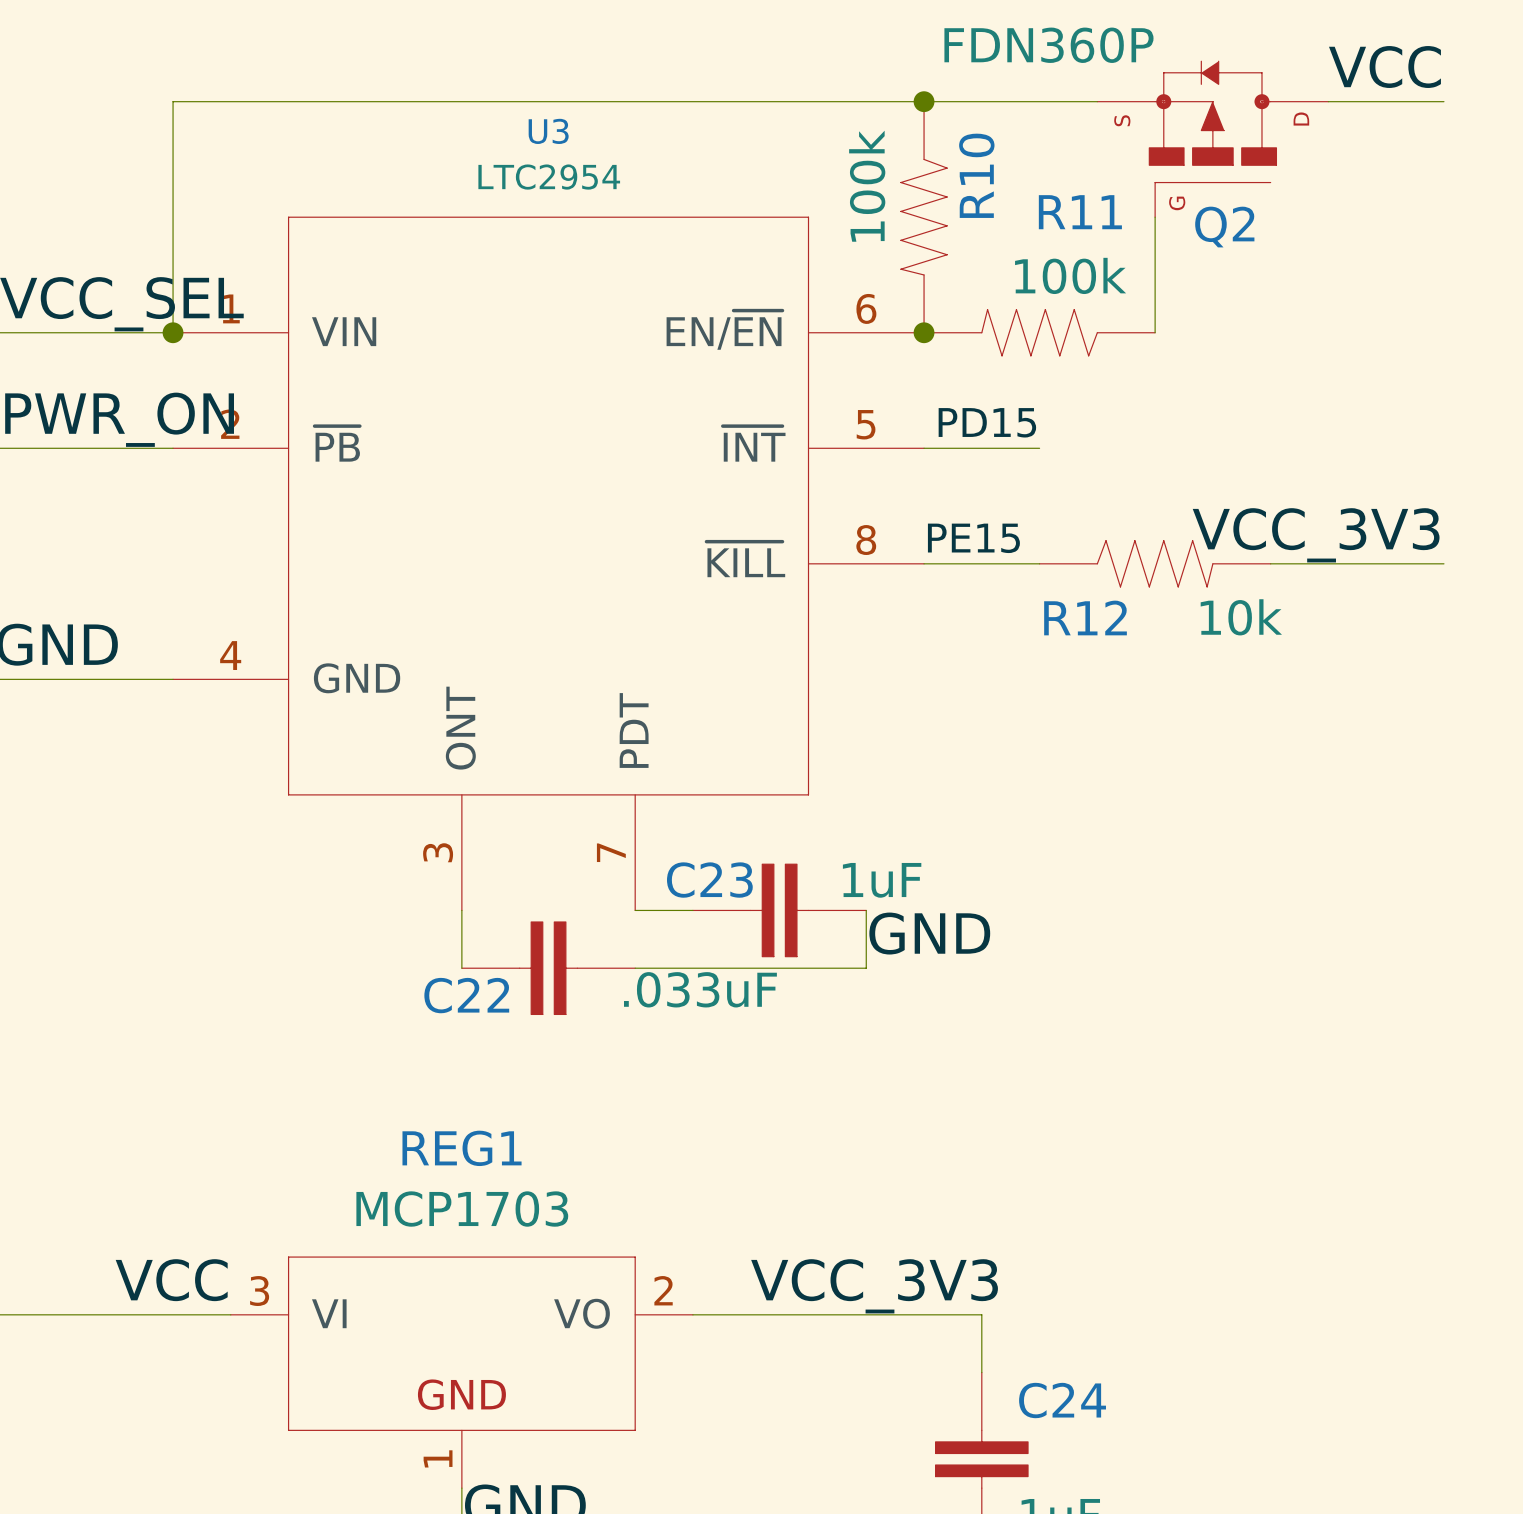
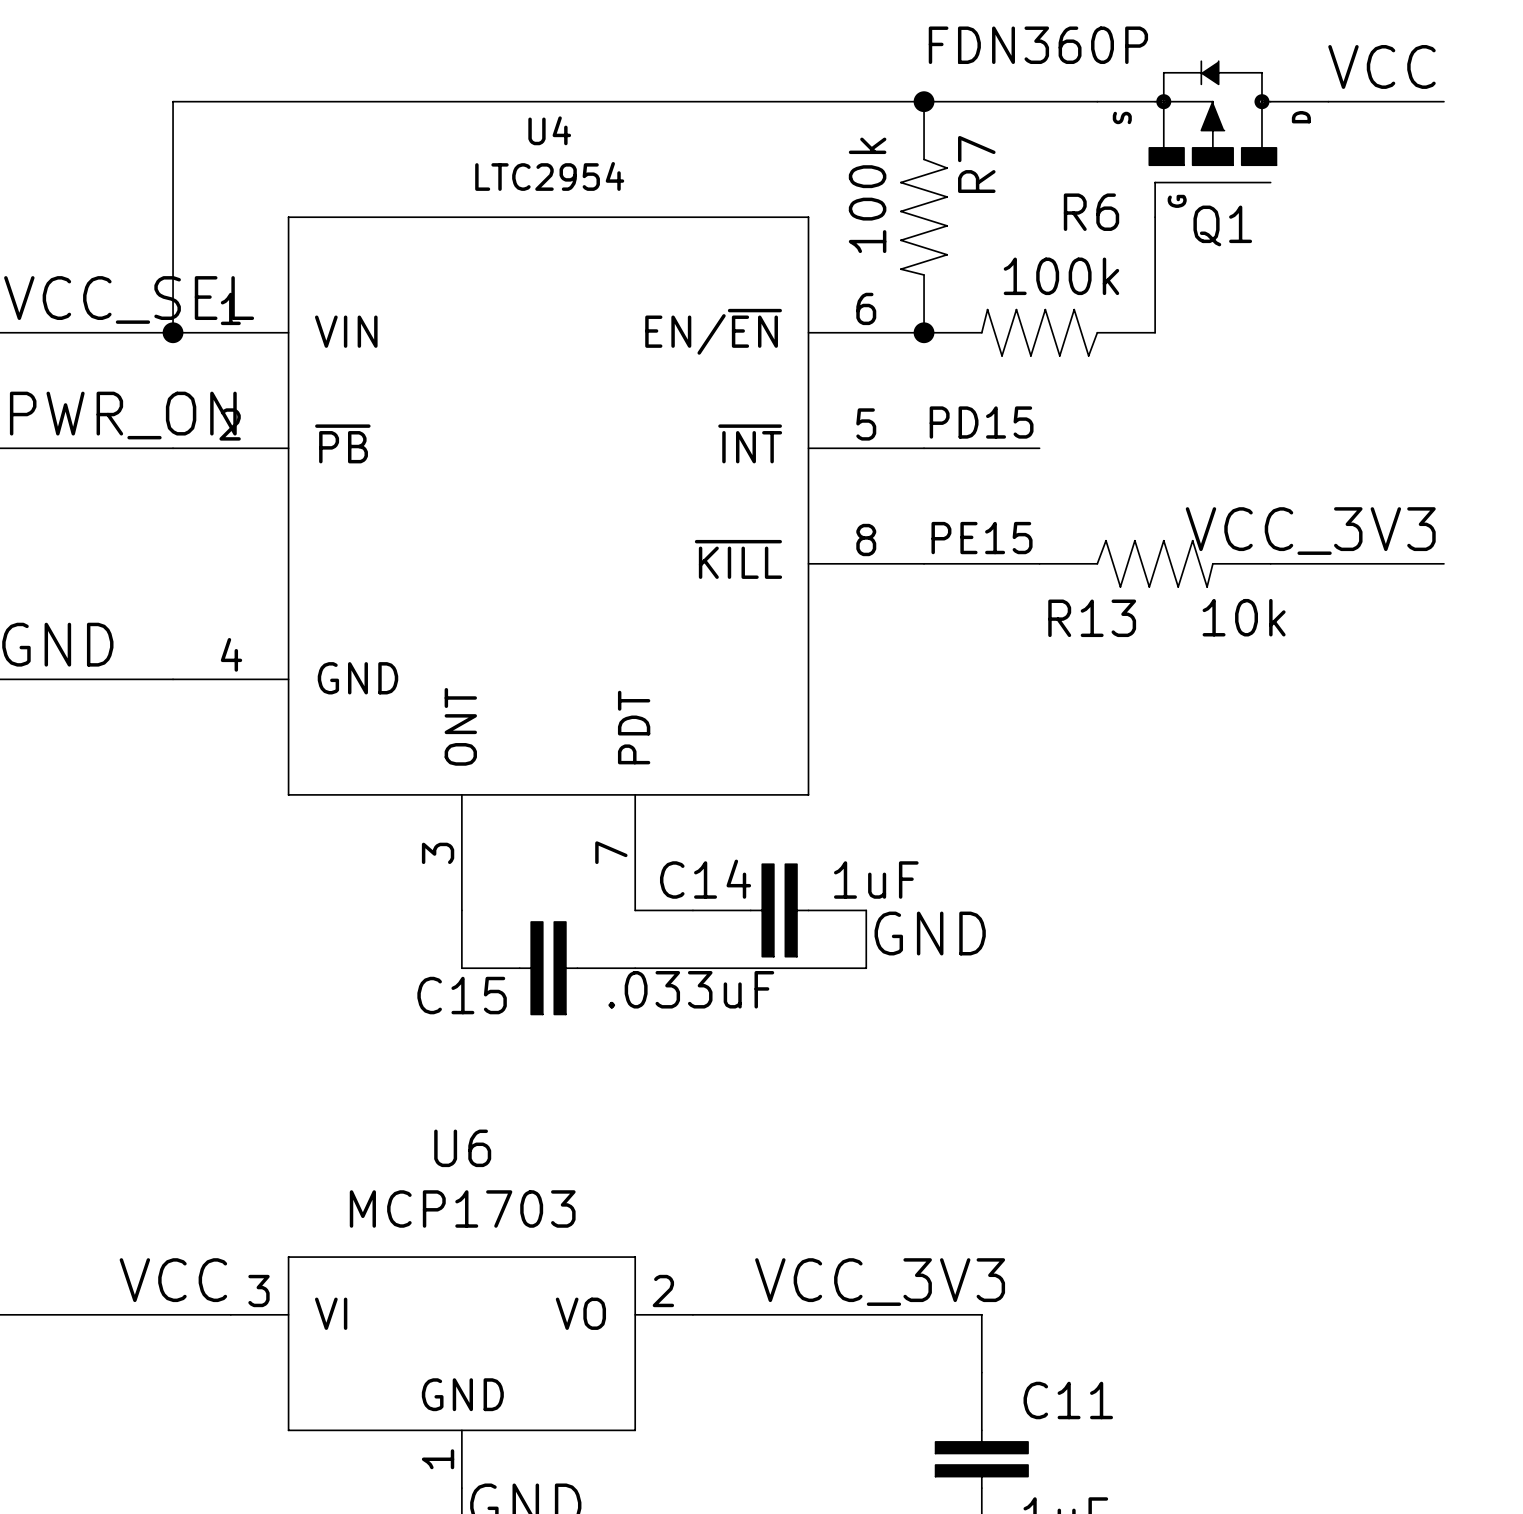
U3 name: U3 (548, 131) -> U4 (549, 130)
R10 name: R10 (976, 175) -> R7 (976, 164)
R11 name: R11 (1080, 212) -> R6 (1091, 212)
Q2 name: Q2 (1224, 227) -> Q1 (1222, 225)
R12 name: R12 (1085, 617) -> R13 (1092, 618)
C23 name: C23 (709, 880) -> C14 (705, 879)
C22 name: C22 (466, 995) -> C15 (462, 995)
REG1 name: REG1 (462, 1148) -> U6 (462, 1148)
C24 name: C24 (1062, 1400) -> C11 (1068, 1400)

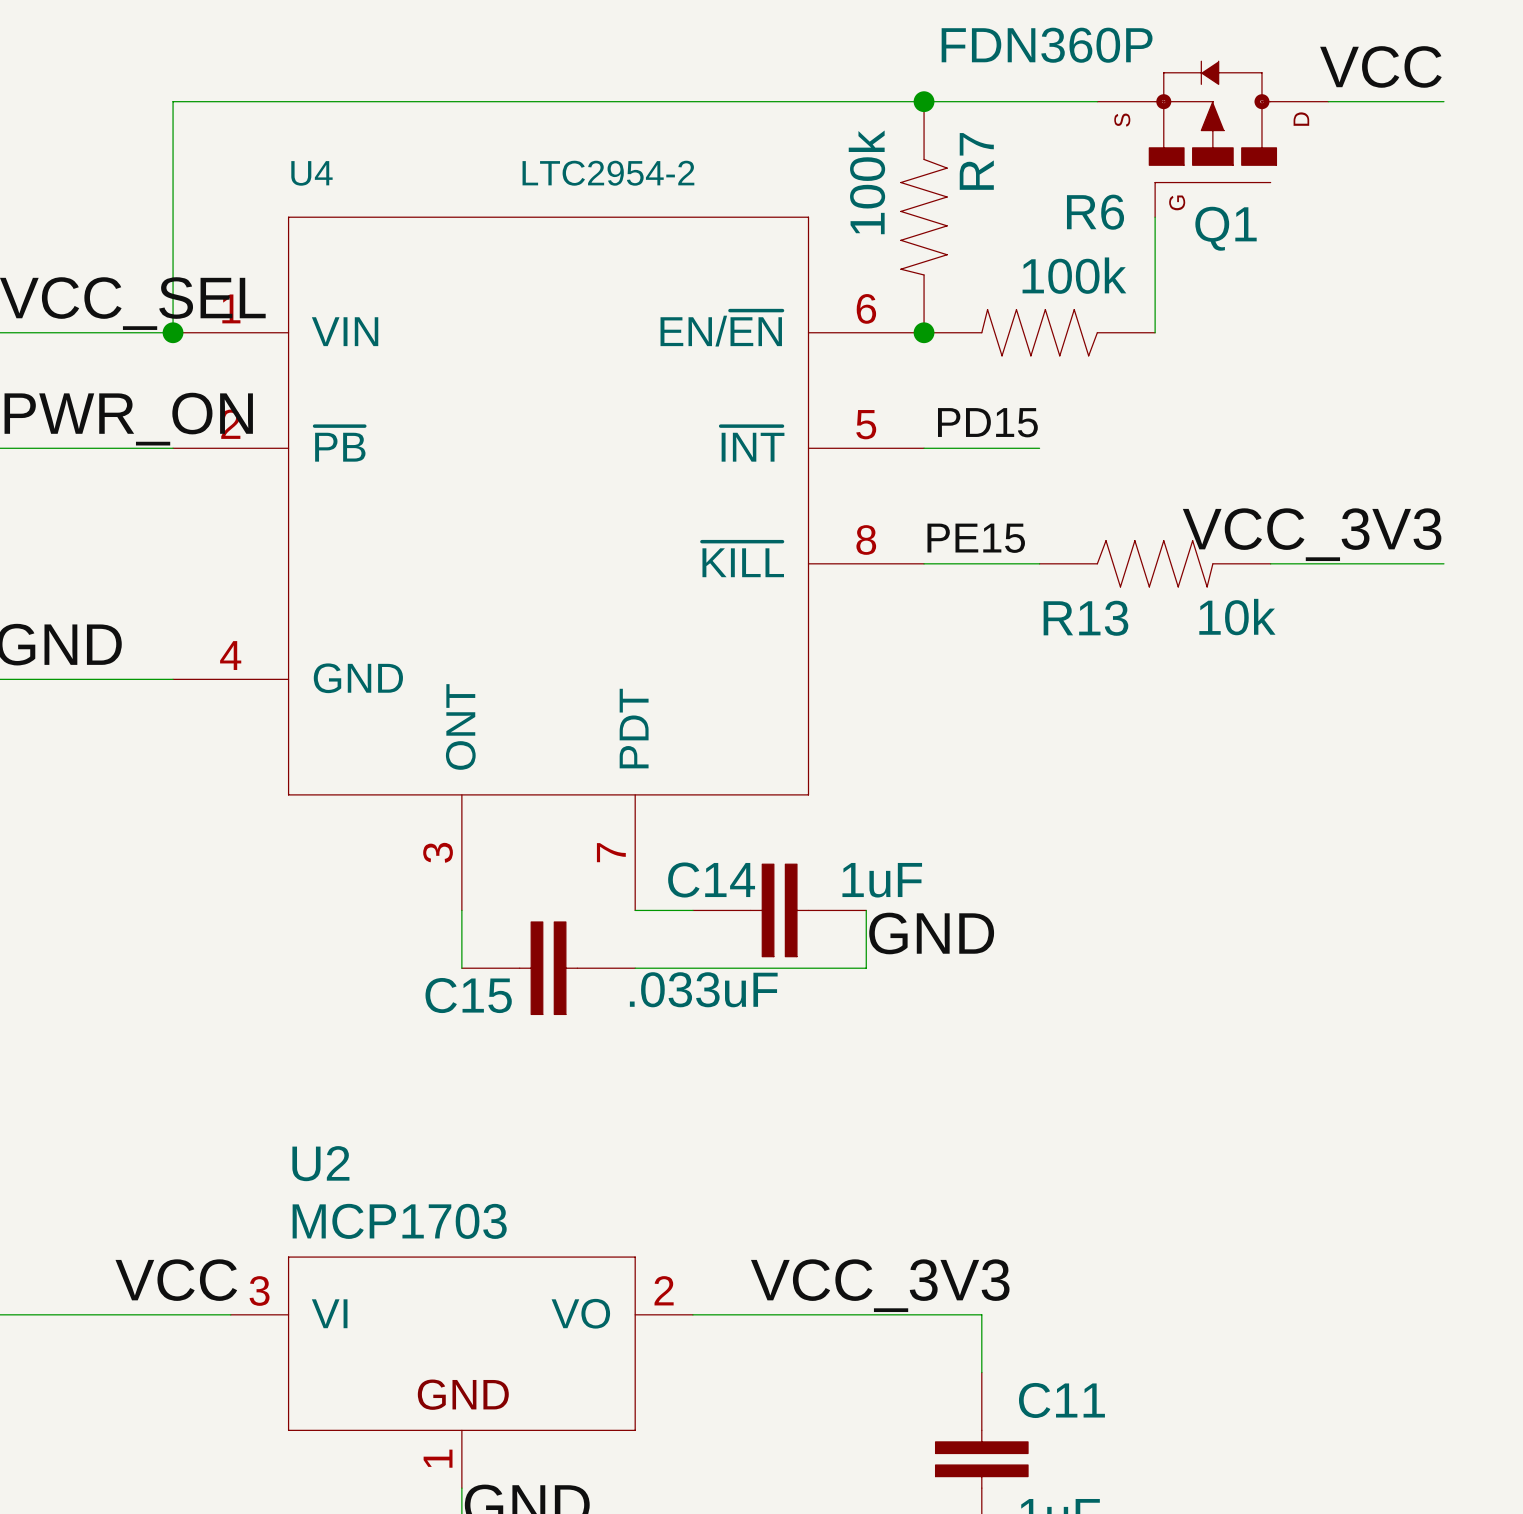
U4 name position: U4 (549, 130) -> U4 (311, 173)
U4 value: LTC2954 (549, 176) -> LTC2954-2 (608, 173)
U6 name: U6 (462, 1148) -> U2 (320, 1163)
U6 value position: MCP1703 (462, 1208) -> MCP1703 (399, 1221)

